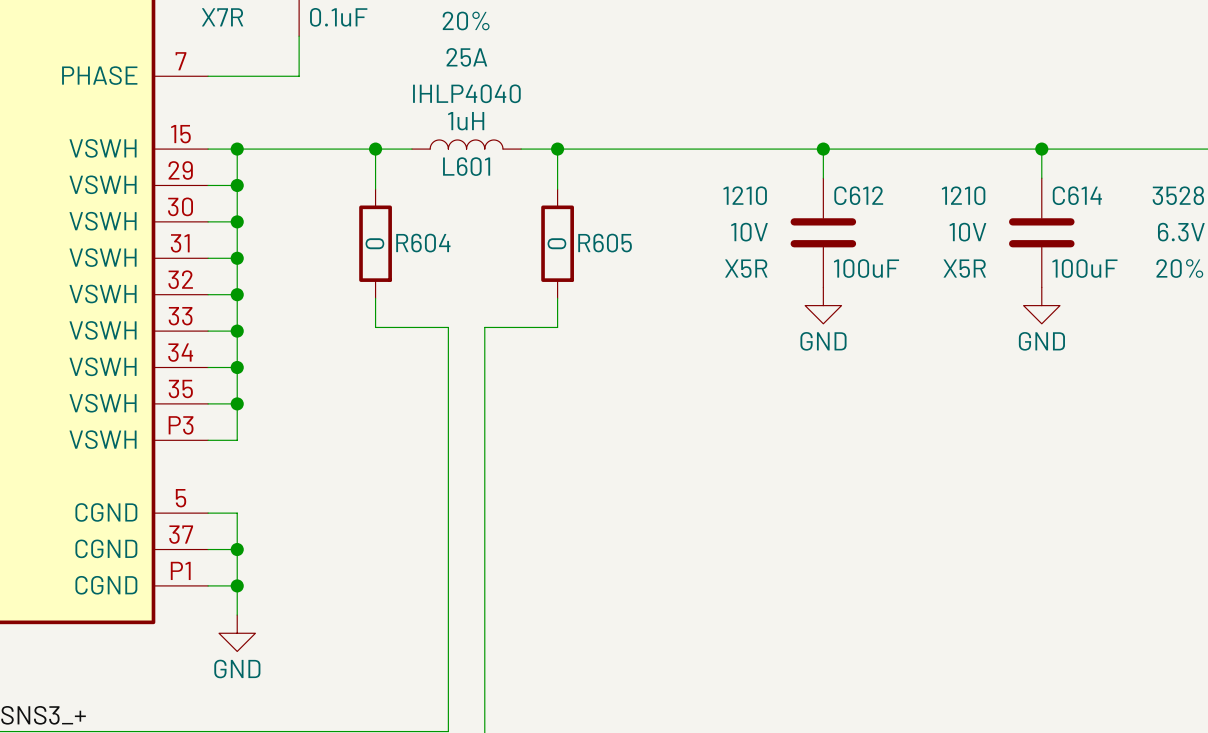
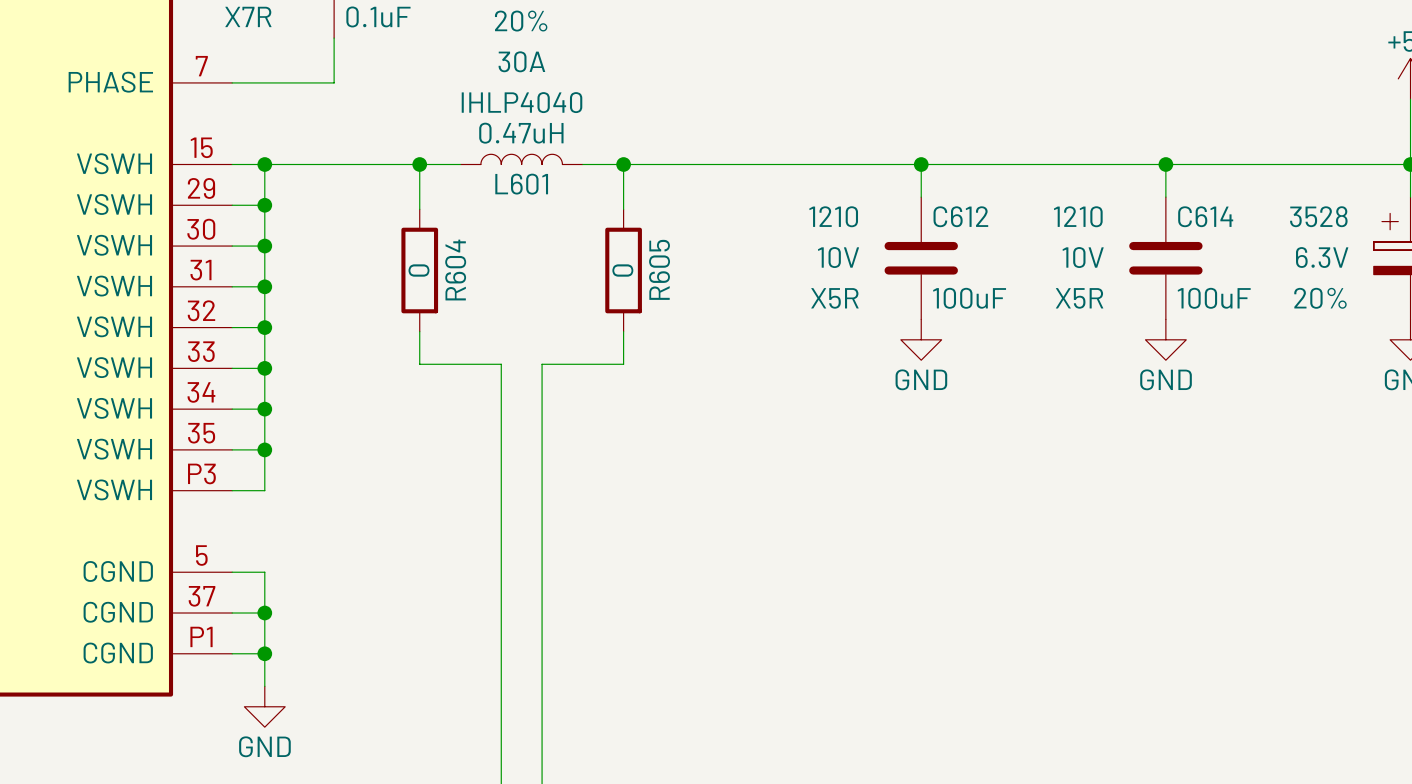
L601 text: 25A (466, 57) -> 30A (521, 61)
L601 value: 1uH (466, 121) -> 0.47uH (521, 133)
R604 name rotation: 0° (423, 243) -> 90° counterclockwise (455, 270)
R605 name rotation: 0° (605, 243) -> 90° counterclockwise (659, 269)

